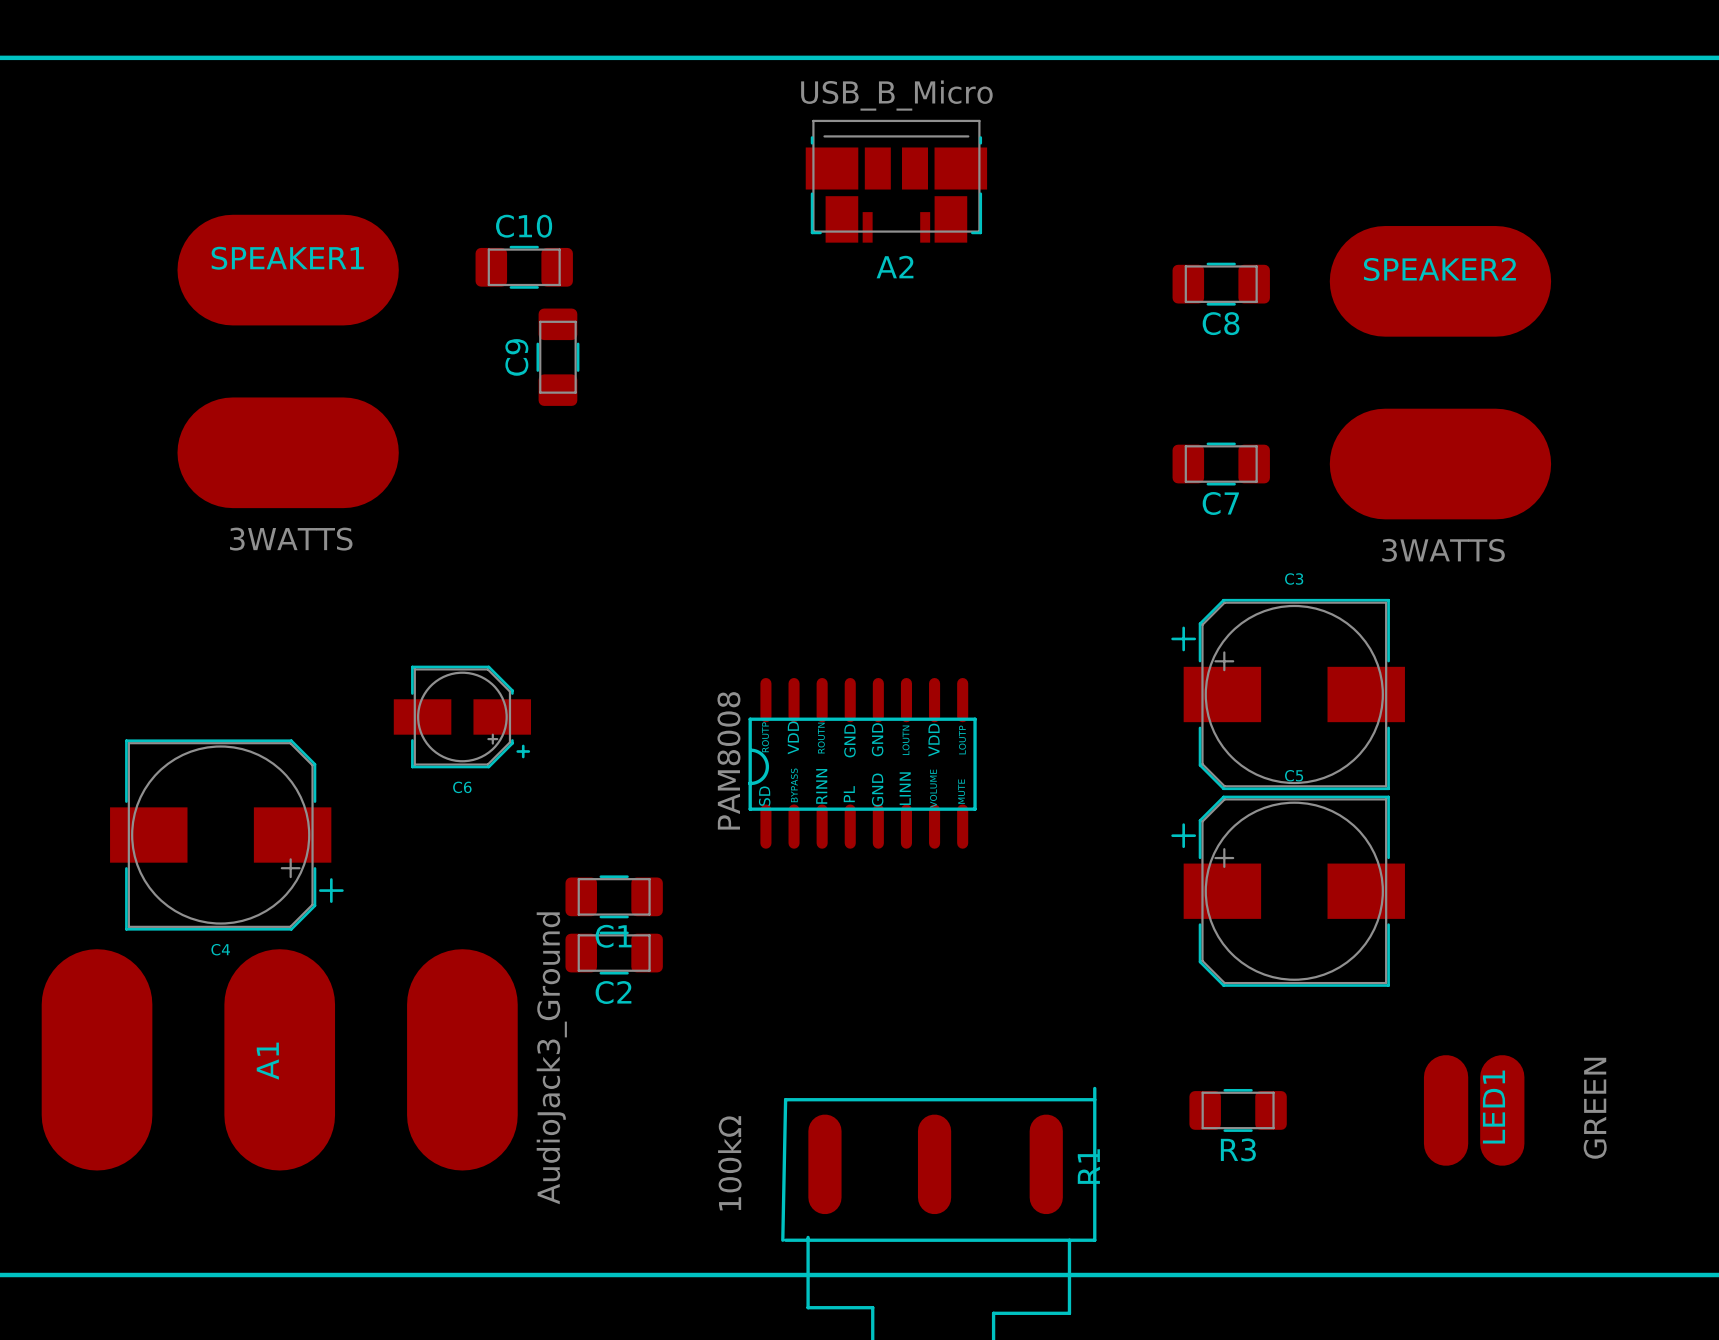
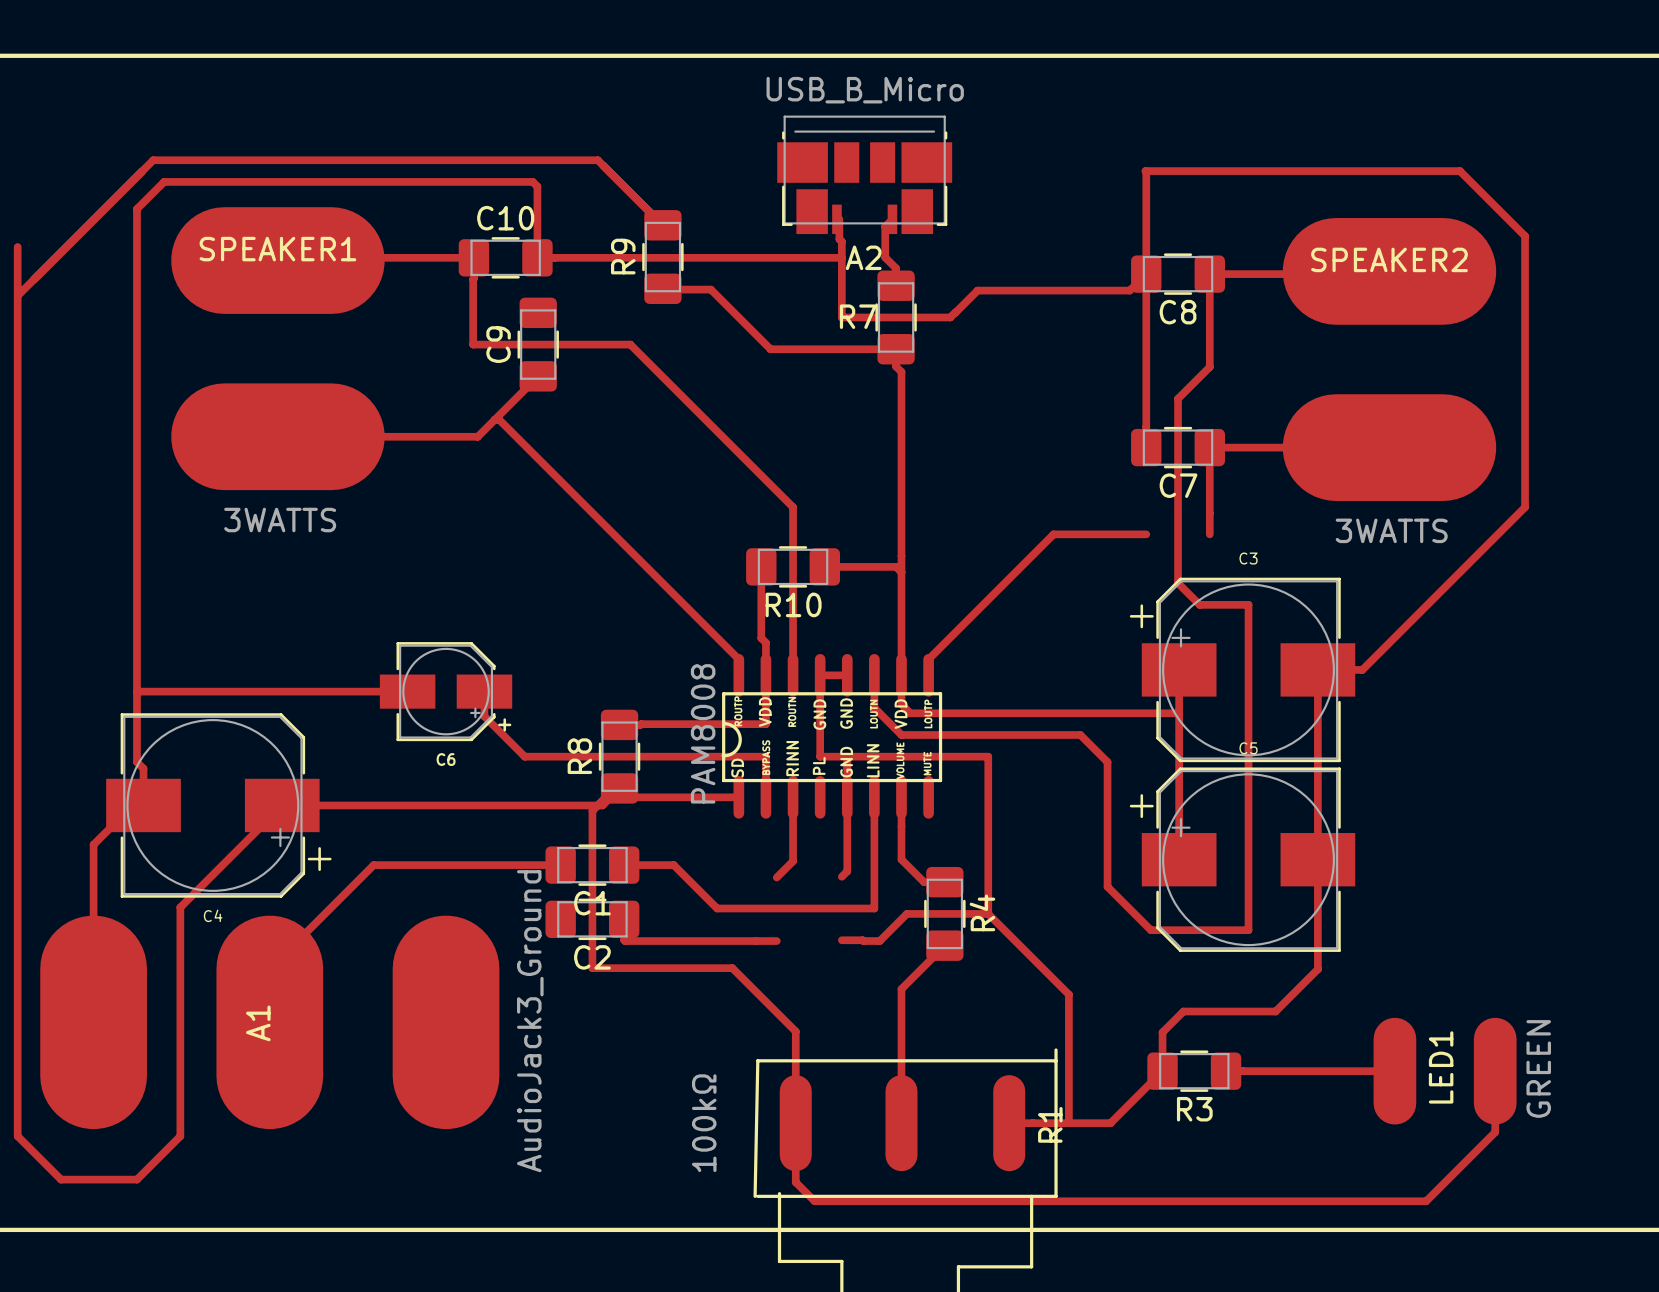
top track: none -> (839, 219) (839, 239) (841, 241) (841, 317) (950, 317) (955, 312)
top track: none -> (889, 221) (885, 226) (885, 257) (896, 268) (896, 285)
top track: none -> (662, 225) (597, 160) (153, 160) (17, 295)
top track: none -> (17, 246) (17, 1136) (61, 1179) (136, 1179) (180, 1136) (180, 907) (271, 816)
R9: none -> (662, 257)
top track: none -> (841, 257) (537, 257) (537, 186) (532, 181) (164, 181) (136, 209) (136, 762) (143, 768) (143, 805) (132, 805) (93, 844) (93, 1022)
top track: none -> (277, 260) (280, 257) (473, 257) (473, 344) (630, 344) (793, 507) (793, 675)
top track: none -> (1389, 271) (1386, 274) (1209, 274) (1209, 367) (1178, 398) (1178, 583) (1199, 604) (1248, 604) (1248, 930) (1150, 930) (1107, 886) (1107, 762) (1080, 734) (901, 734) (874, 707) (874, 675)
top track: none -> (1146, 274) (1129, 290) (977, 290) (955, 312)
top track: none -> (662, 289) (710, 289) (770, 349) (896, 349) (896, 366) (901, 372) (901, 704) (910, 713) (1179, 713)
R7: none -> (896, 317)
top track: none -> (538, 376) (477, 436) (277, 436)
top track: none -> (494, 419) (499, 419) (738, 659) (738, 675)
top track: none -> (1146, 447) (1145, 171) (1459, 171) (1525, 236) (1525, 507) (1362, 669) (1317, 669) (1317, 969) (1275, 1011) (1183, 1011) (1162, 1032) (1162, 1071) (1110, 1123) (1009, 1123)
top track: none -> (1389, 447) (1209, 447) (1209, 534)
top track: none -> (1146, 534) (1053, 534) (928, 659) (928, 675)
top track: none -> (761, 566) (761, 638) (765, 642) (765, 724) (619, 724)
R10: none -> (793, 566)
top track: none -> (824, 566) (896, 566) (901, 572)
top track: none -> (1179, 669) (1179, 859)
top track: none -> (847, 675) (820, 675) (820, 756) (988, 756) (988, 913)
top track: none -> (136, 691) (407, 691)
top track: none -> (484, 691) (484, 716) (524, 756) (765, 756) (765, 797)
R8: none -> (619, 756)
top track: none -> (847, 756) (847, 871) (841, 876)
top track: none -> (619, 788) (602, 805) (282, 805)
top track: none -> (738, 797) (605, 797) (592, 810) (592, 968) (732, 968) (795, 1031) (795, 1182) (814, 1201) (1426, 1201) (1495, 1132) (1495, 1071)
top track: none -> (793, 797) (793, 861) (776, 877)
top track: none -> (874, 797) (874, 908) (717, 908) (673, 865) (624, 865)
top track: none -> (901, 797) (901, 859) (924, 882) (944, 882)
top track: none -> (560, 865) (373, 865) (269, 968) (269, 1022)
R4: none -> (944, 913)
top track: none -> (988, 913) (906, 913) (879, 941) (841, 940)
top track: none -> (988, 913) (1068, 994) (1068, 1123)
top track: none -> (624, 919) (625, 941) (776, 941)
top track: none -> (944, 945) (901, 989) (901, 1123)
LED1 footprint: [1423, 1055, 1525, 1166] -> [1373, 1017, 1517, 1125]
top track: none -> (1226, 1071) (1394, 1071)

